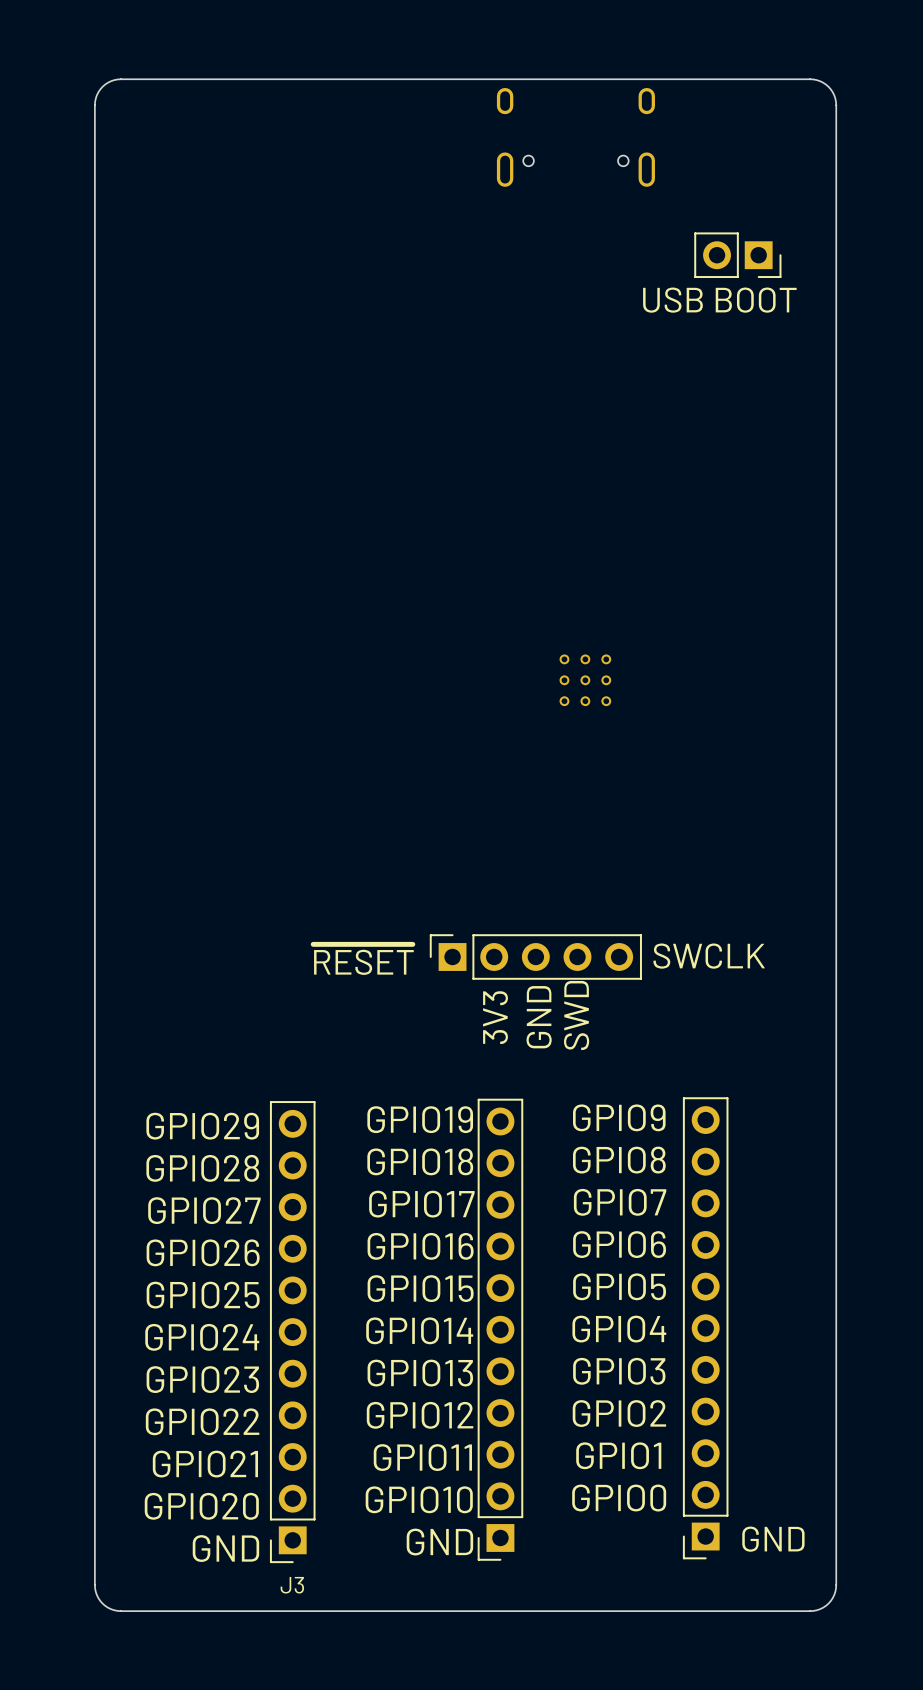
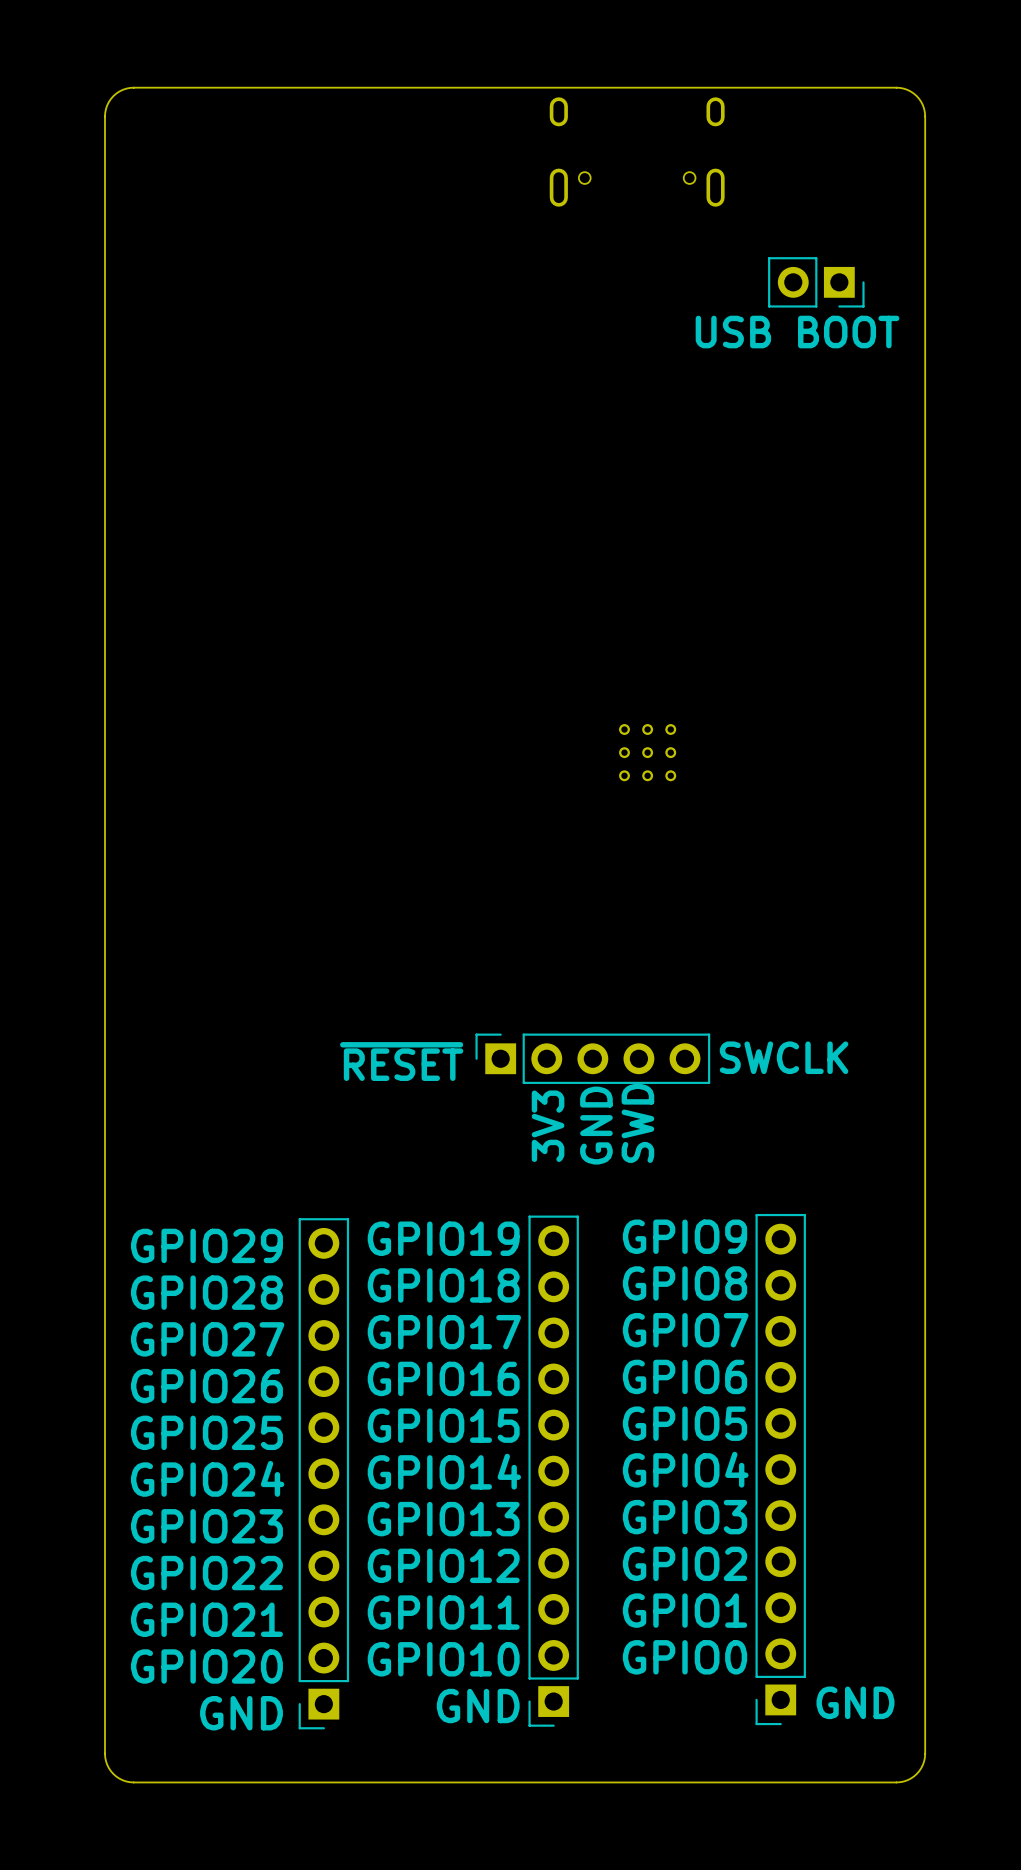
J3 name: J3 (292, 1585) -> none

